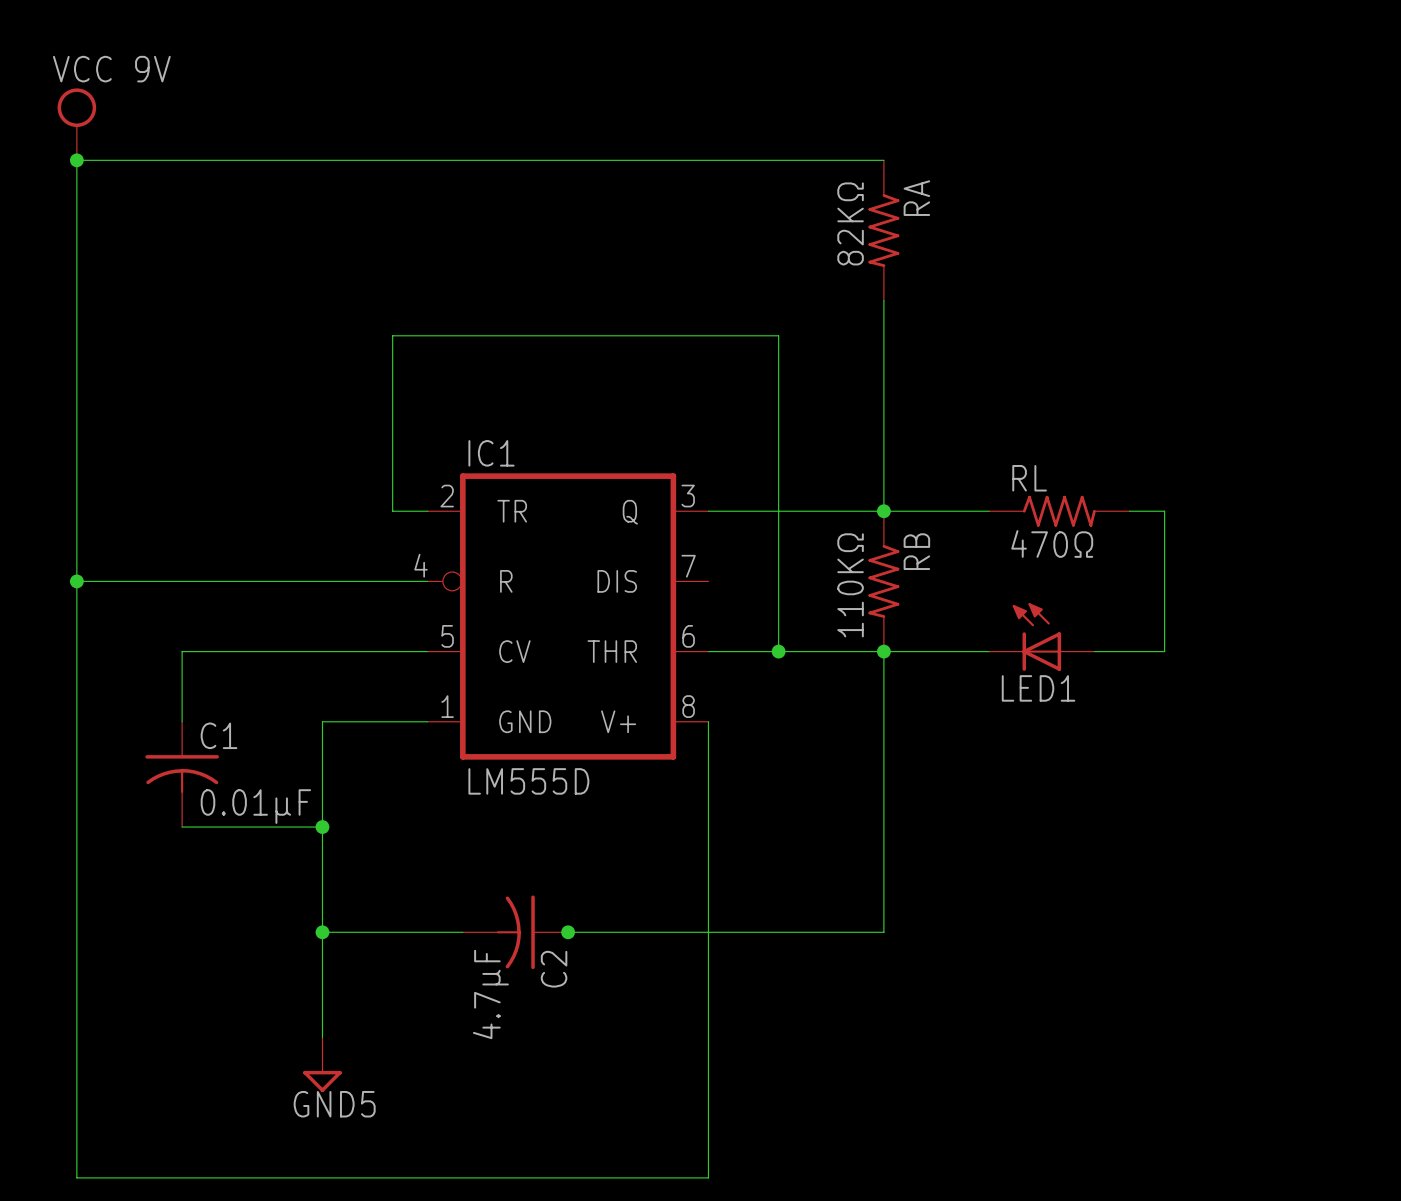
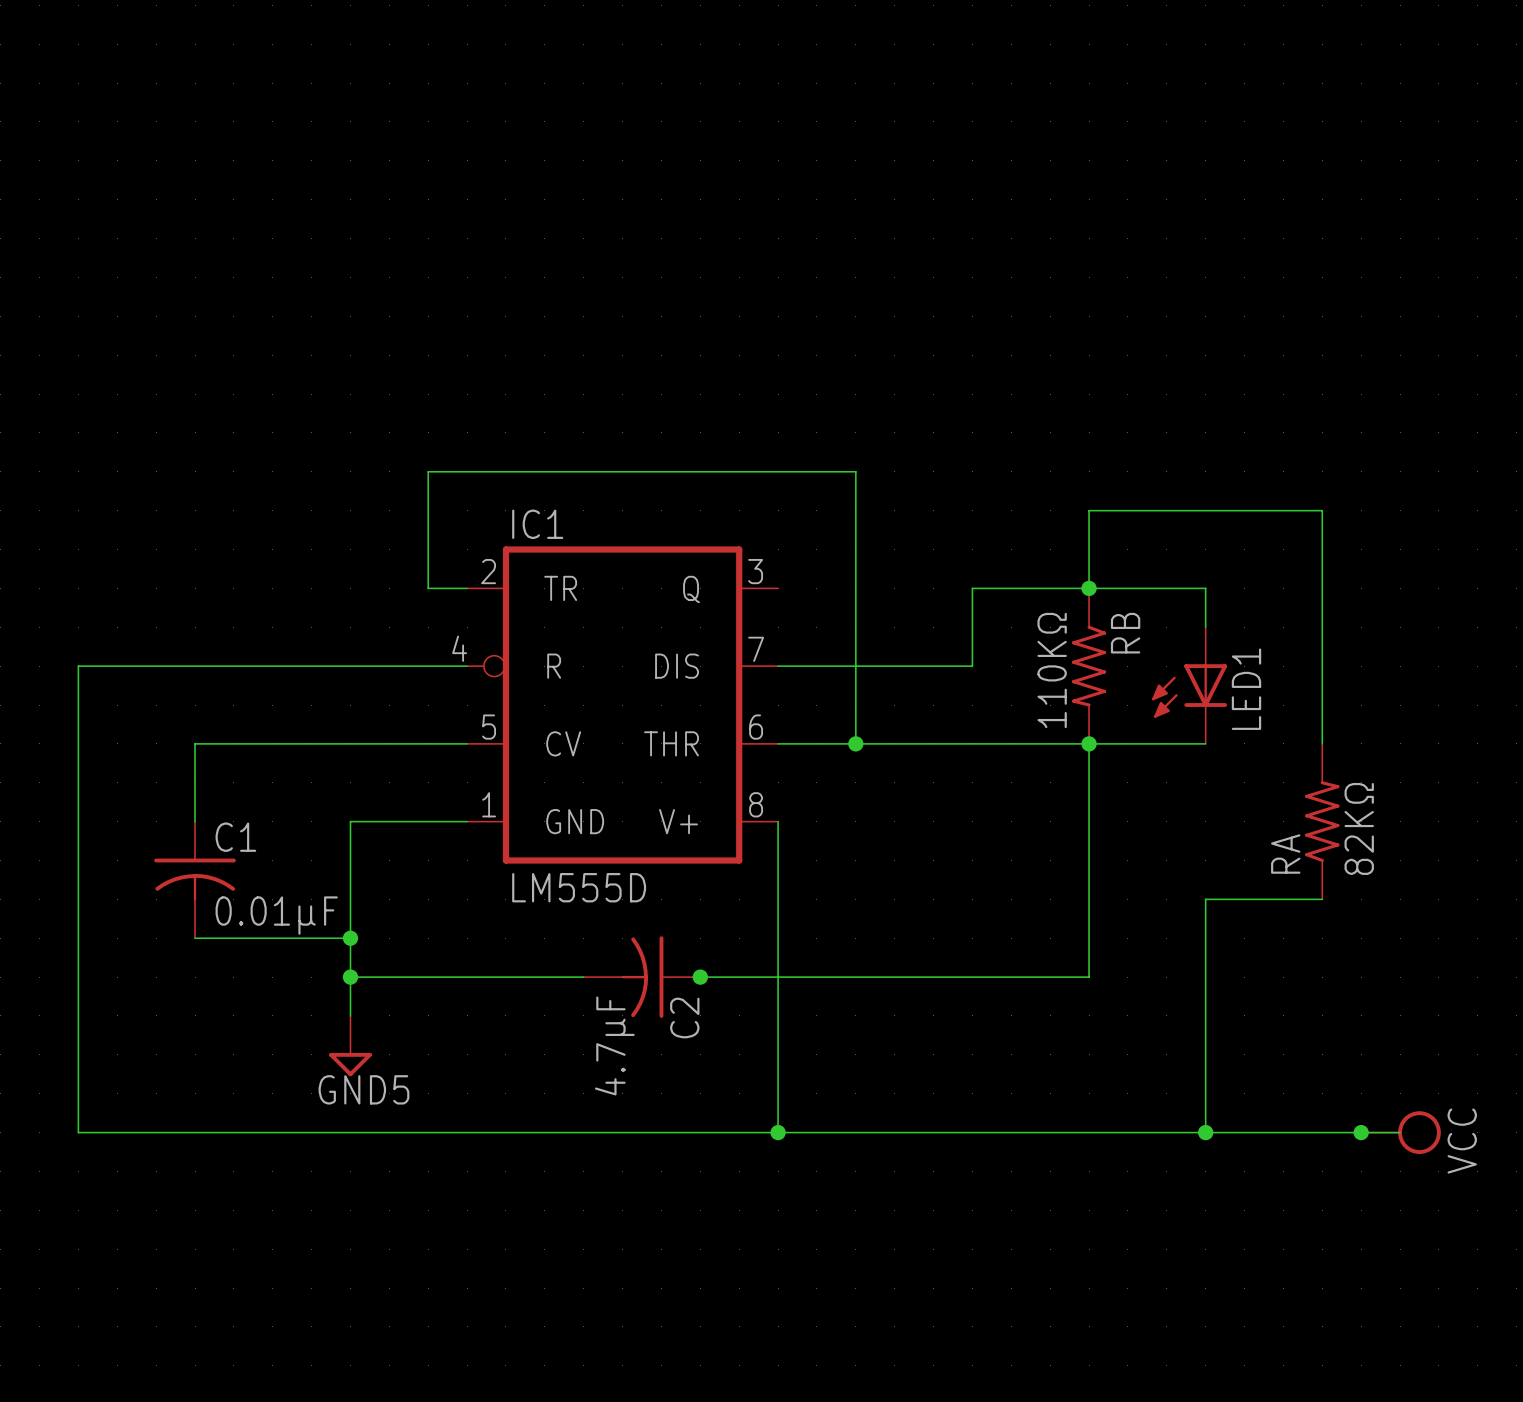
power symbol: VCC 9V (76, 124) -> none
junction: (76, 160) -> none
wire: (883, 160) (76, 160) (76, 581) -> none
RA: 82KΩ (883, 230) -> none
wire: (883, 300) (883, 511) (708, 511) -> none
wire: (392, 405) (392, 335) (778, 335) (778, 405) -> (428, 471) (855, 471)
wire: none -> (972, 588) (972, 666) (778, 666)
junction: (883, 511) -> none
junction: none -> (1089, 588)
RL: 470Ω (1059, 511) -> none
wire: (1129, 511) (1164, 511) (1164, 651) (1094, 651) -> (700, 977) (1089, 977) (1089, 743) (1205, 743)
wire: none -> (1205, 627) (1205, 588) (1089, 588) (1089, 510) (1322, 510) (1322, 743)
junction: (76, 581) -> none
RB position: (883, 581) -> (1089, 666)
LED1 rotation: 0° (1036, 637) -> 90° counterclockwise (1189, 691)
wire: (883, 651) (883, 932) (568, 932) -> none
junction: (883, 651) -> none
junction: none -> (1089, 743)
RA: none -> 82KΩ (1322, 821)
wire: none -> (1322, 899) (1205, 899) (1205, 1132)
wire: none -> (350, 977) (583, 977)
junction: none -> (700, 977)
wire: (322, 897) (322, 1037) -> none
wire: (322, 932) (462, 932) -> none
junction position: (322, 932) -> (350, 977)
C2 position: (515, 932) -> (642, 977)
junction: (568, 932) -> none
wire: (76, 1002) (76, 1177) (708, 1177) (708, 1002) -> (78, 1132) (1400, 1132)
junction: none -> (778, 1132)
junction: none -> (1205, 1132)
junction: none -> (1361, 1132)
power symbol: none -> VCC (1401, 1132)
power symbol position: GND5 (322, 1064) -> GND5 (350, 1046)

